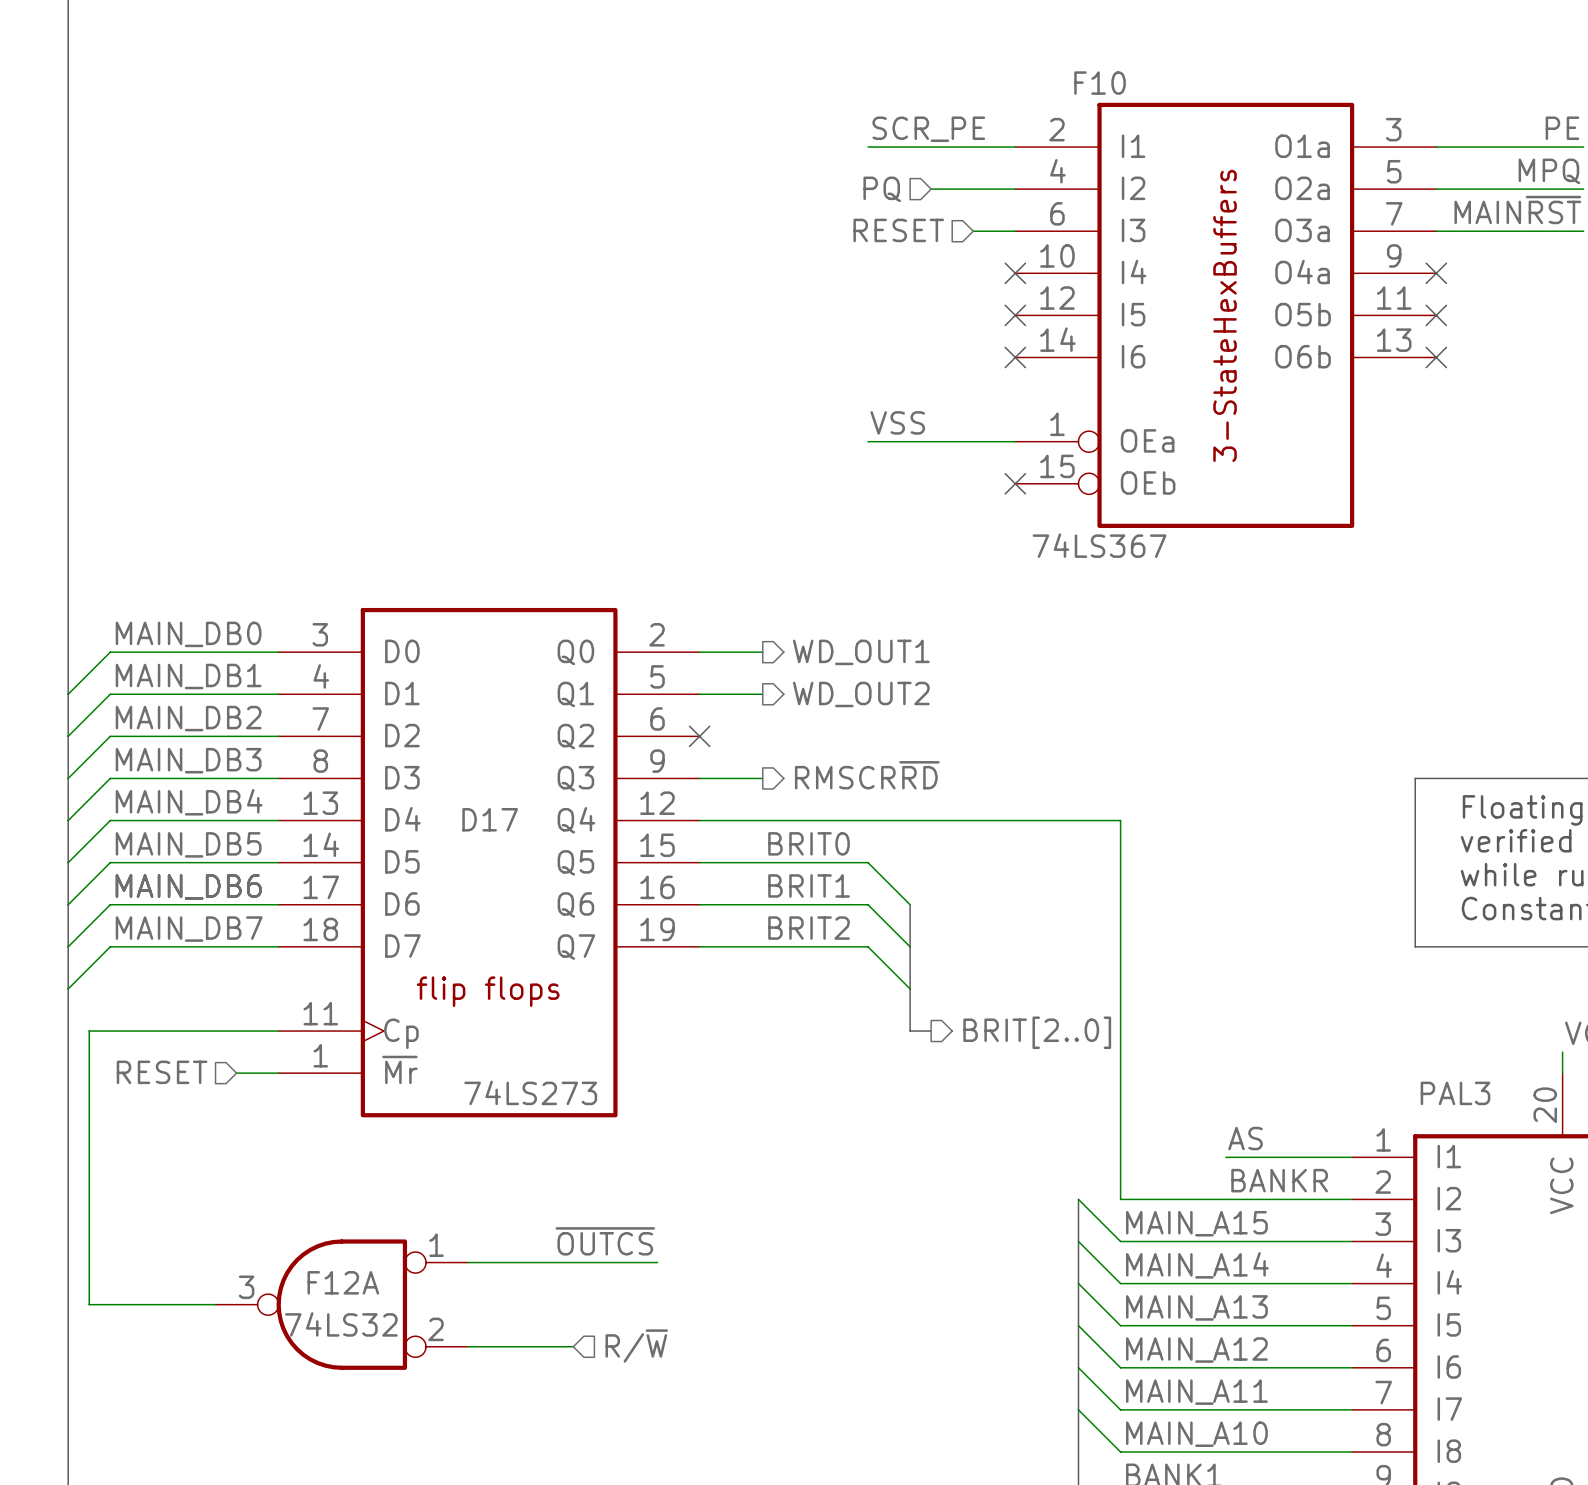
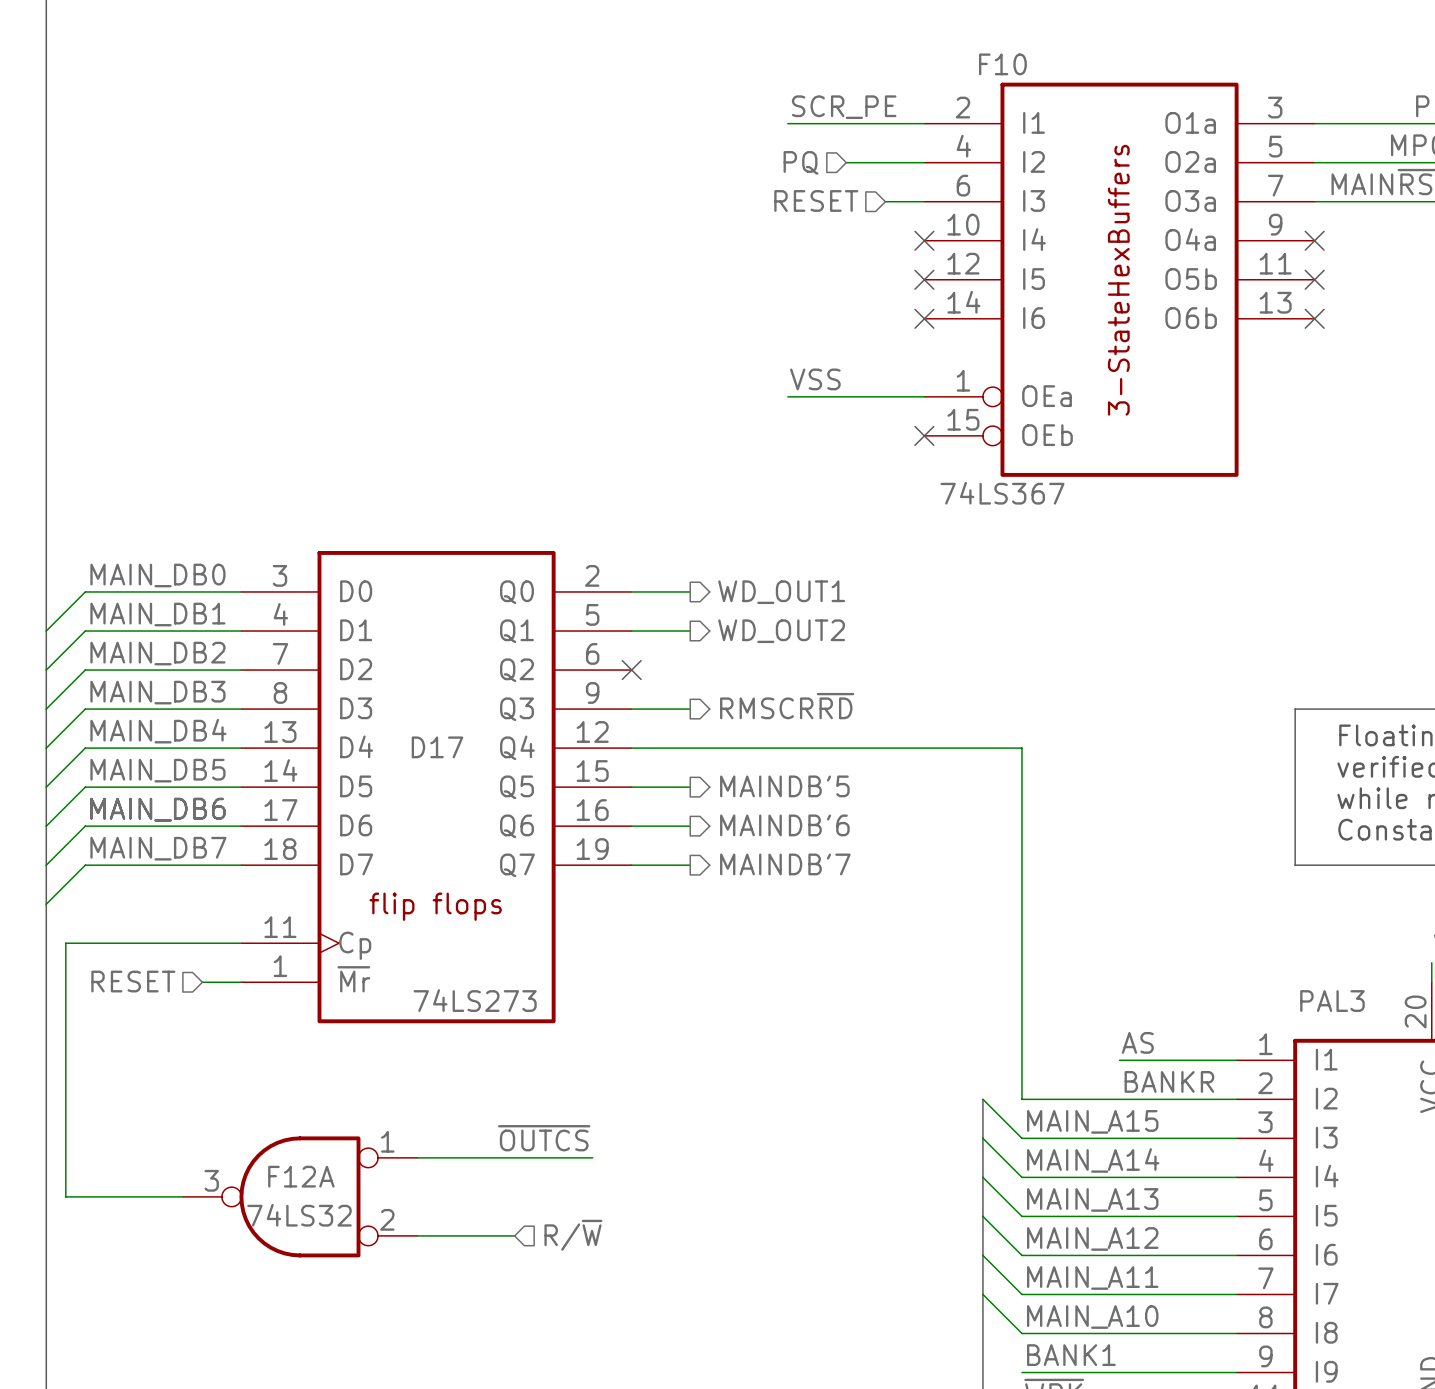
label: BRIT0 (809, 843) -> none
hierarchical label: none -> MAINDB'5 (784, 786)
wire: (762, 862) (868, 862) (910, 904) -> none
label: BRIT1 (809, 885) -> none
hierarchical label: none -> MAINDB'6 (784, 825)
wire: (762, 904) (868, 904) (910, 946) -> none
bus: (910, 904) (910, 1031) (931, 1031) -> none
label: BRIT2 (809, 928) -> none
wire: (762, 946) (868, 946) (910, 988) -> none
hierarchical label: none -> MAINDB'7 (785, 864)
hierarchical label: BRIT[2..0] (1037, 1032) -> none

